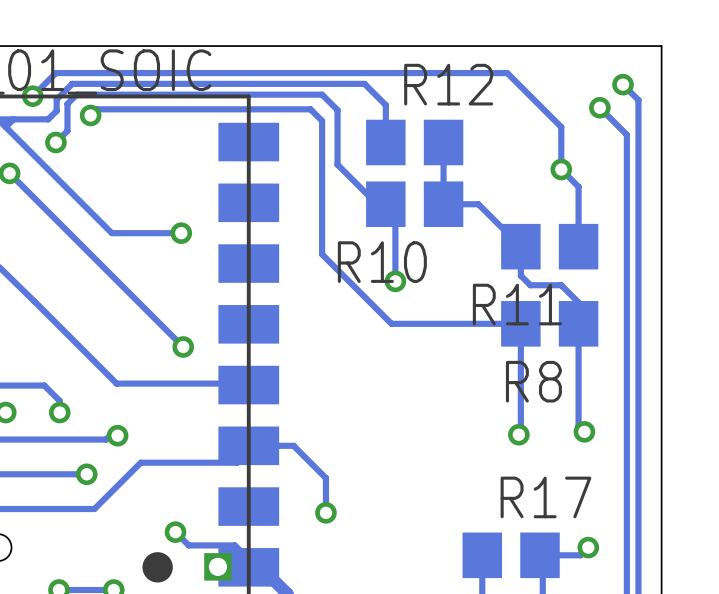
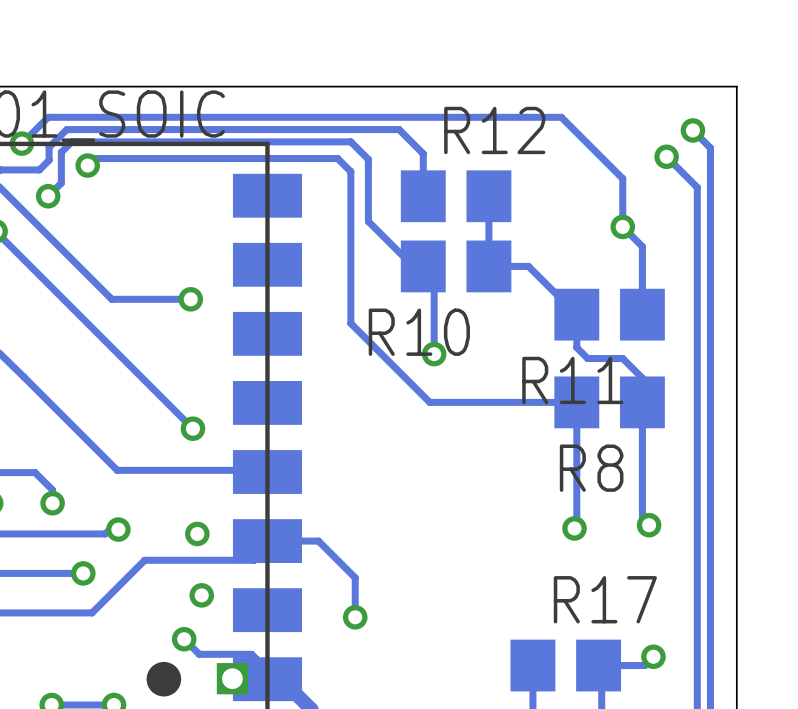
via: none -> (197, 533)
via: none -> (201, 595)

